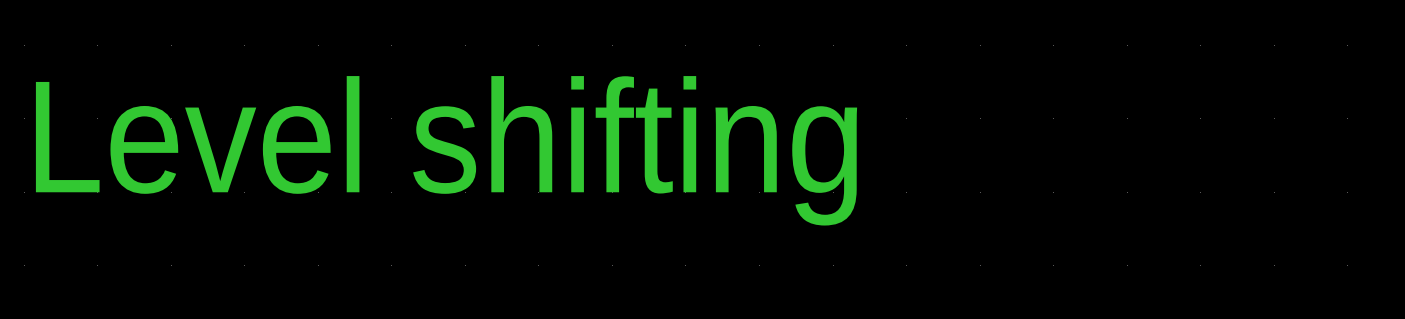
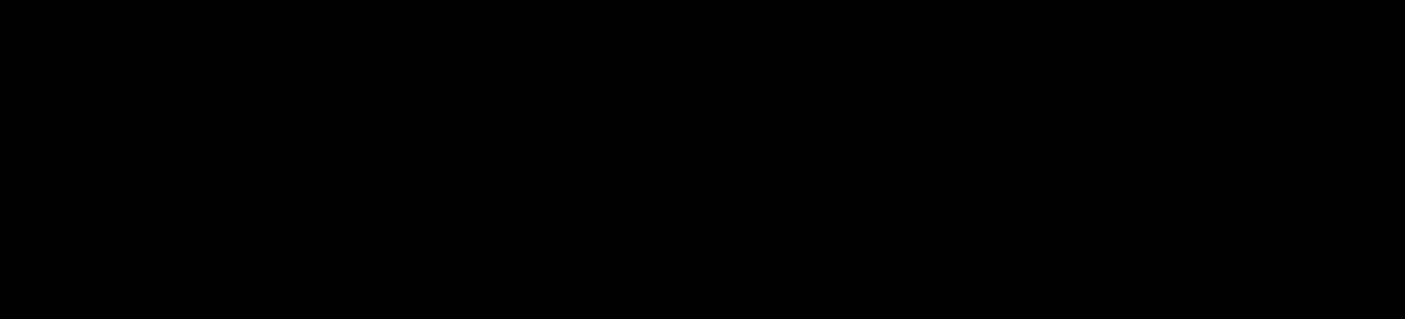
text: Level shifting (446, 150) -> none

